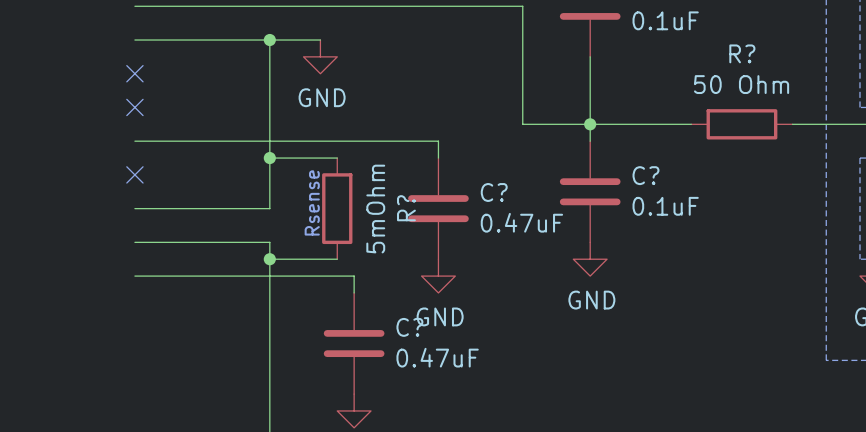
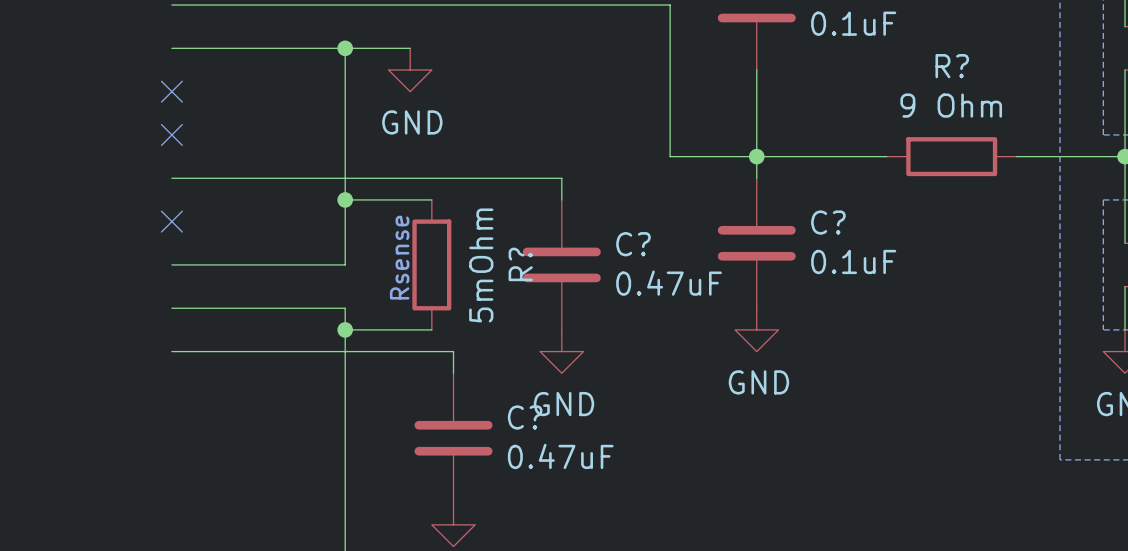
R? value: 50 Ohm (741, 84) -> 9 Ohm (951, 105)

